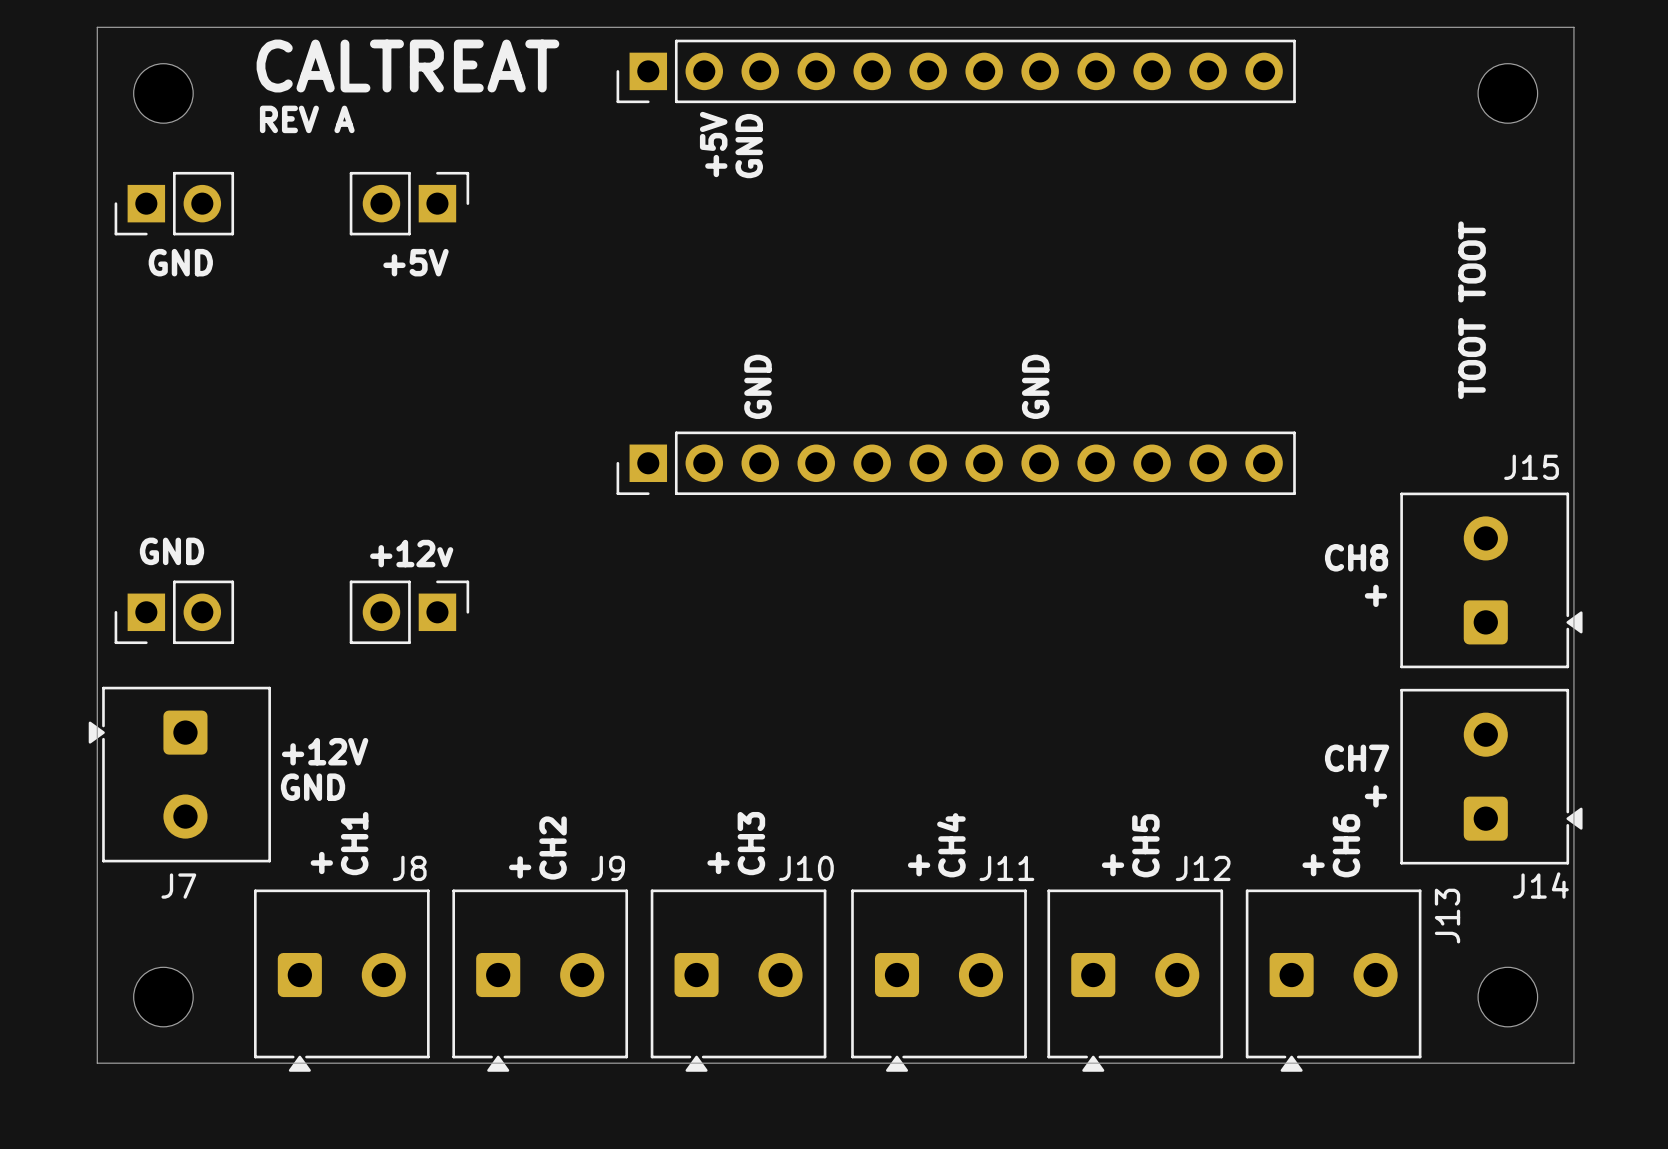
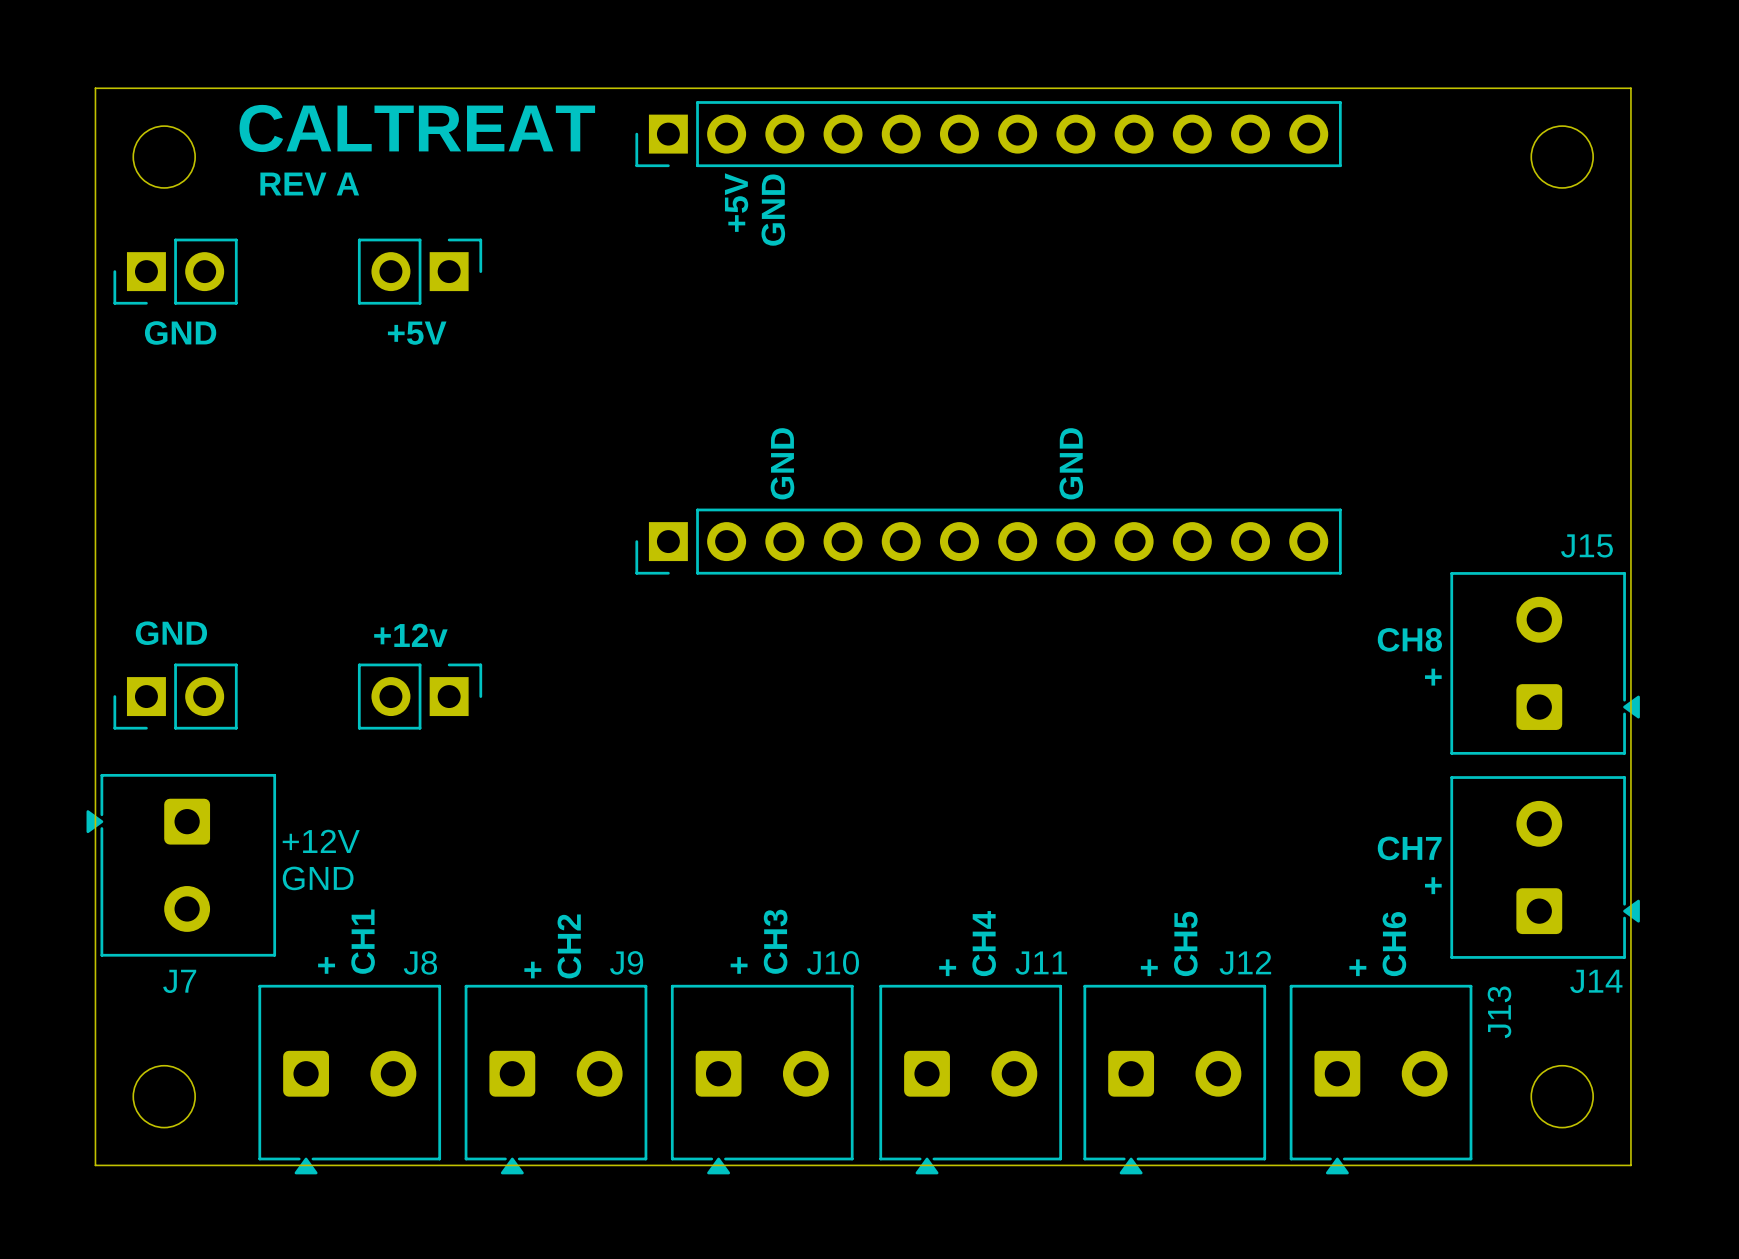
text: TOOT TOOT (1472, 310) -> none

